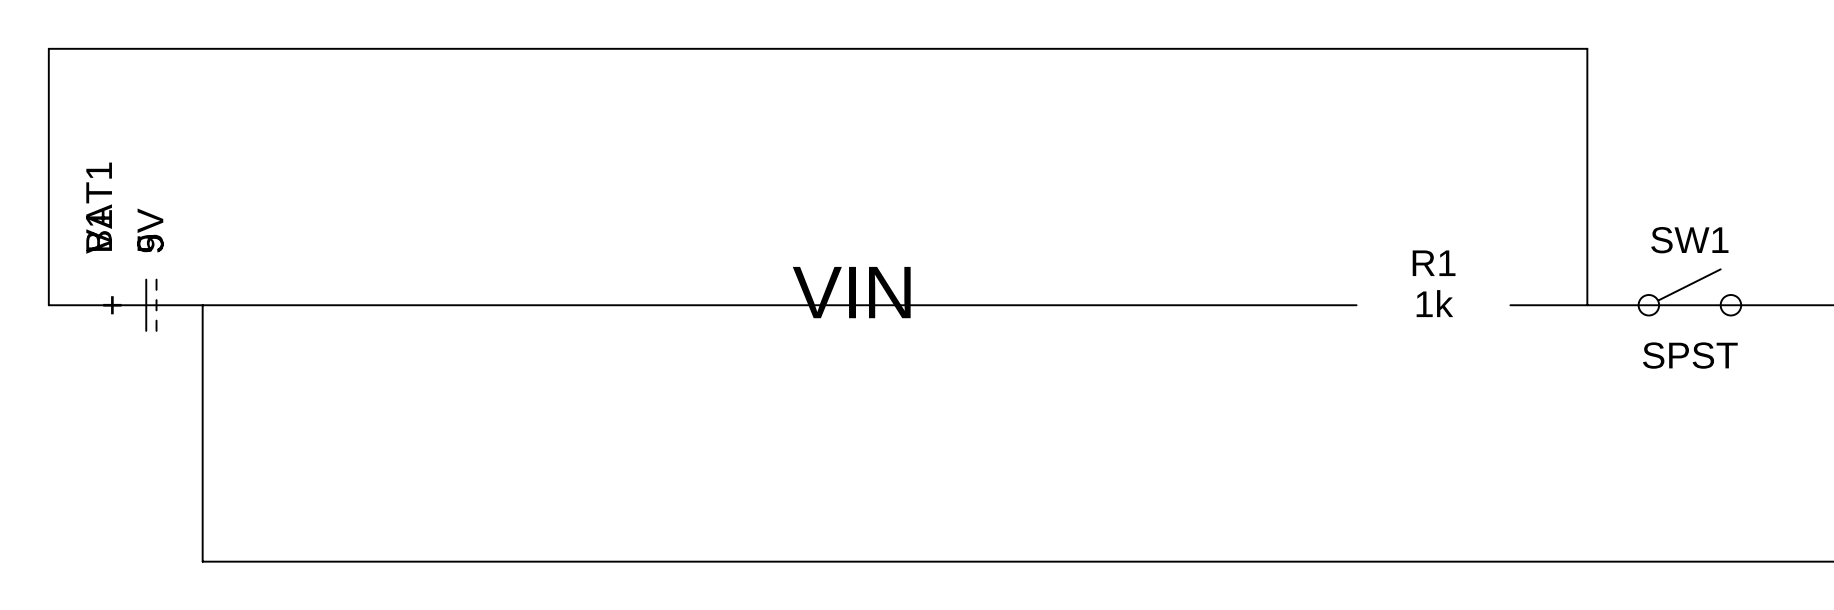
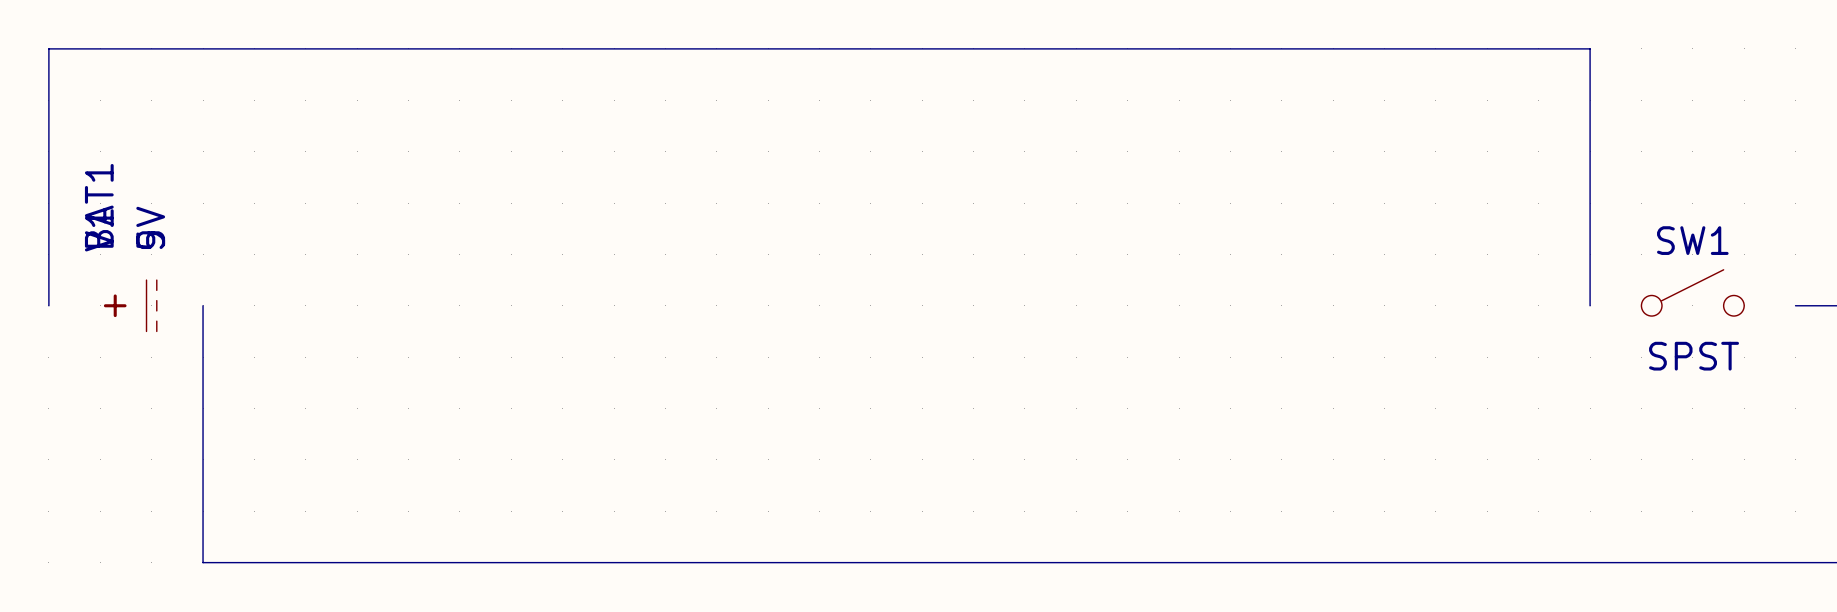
R1: 1k (1434, 283) -> none
label: VIN (851, 292) -> none
wire: (48, 305) (1356, 305) -> none
wire: (1510, 305) (1792, 305) -> none

